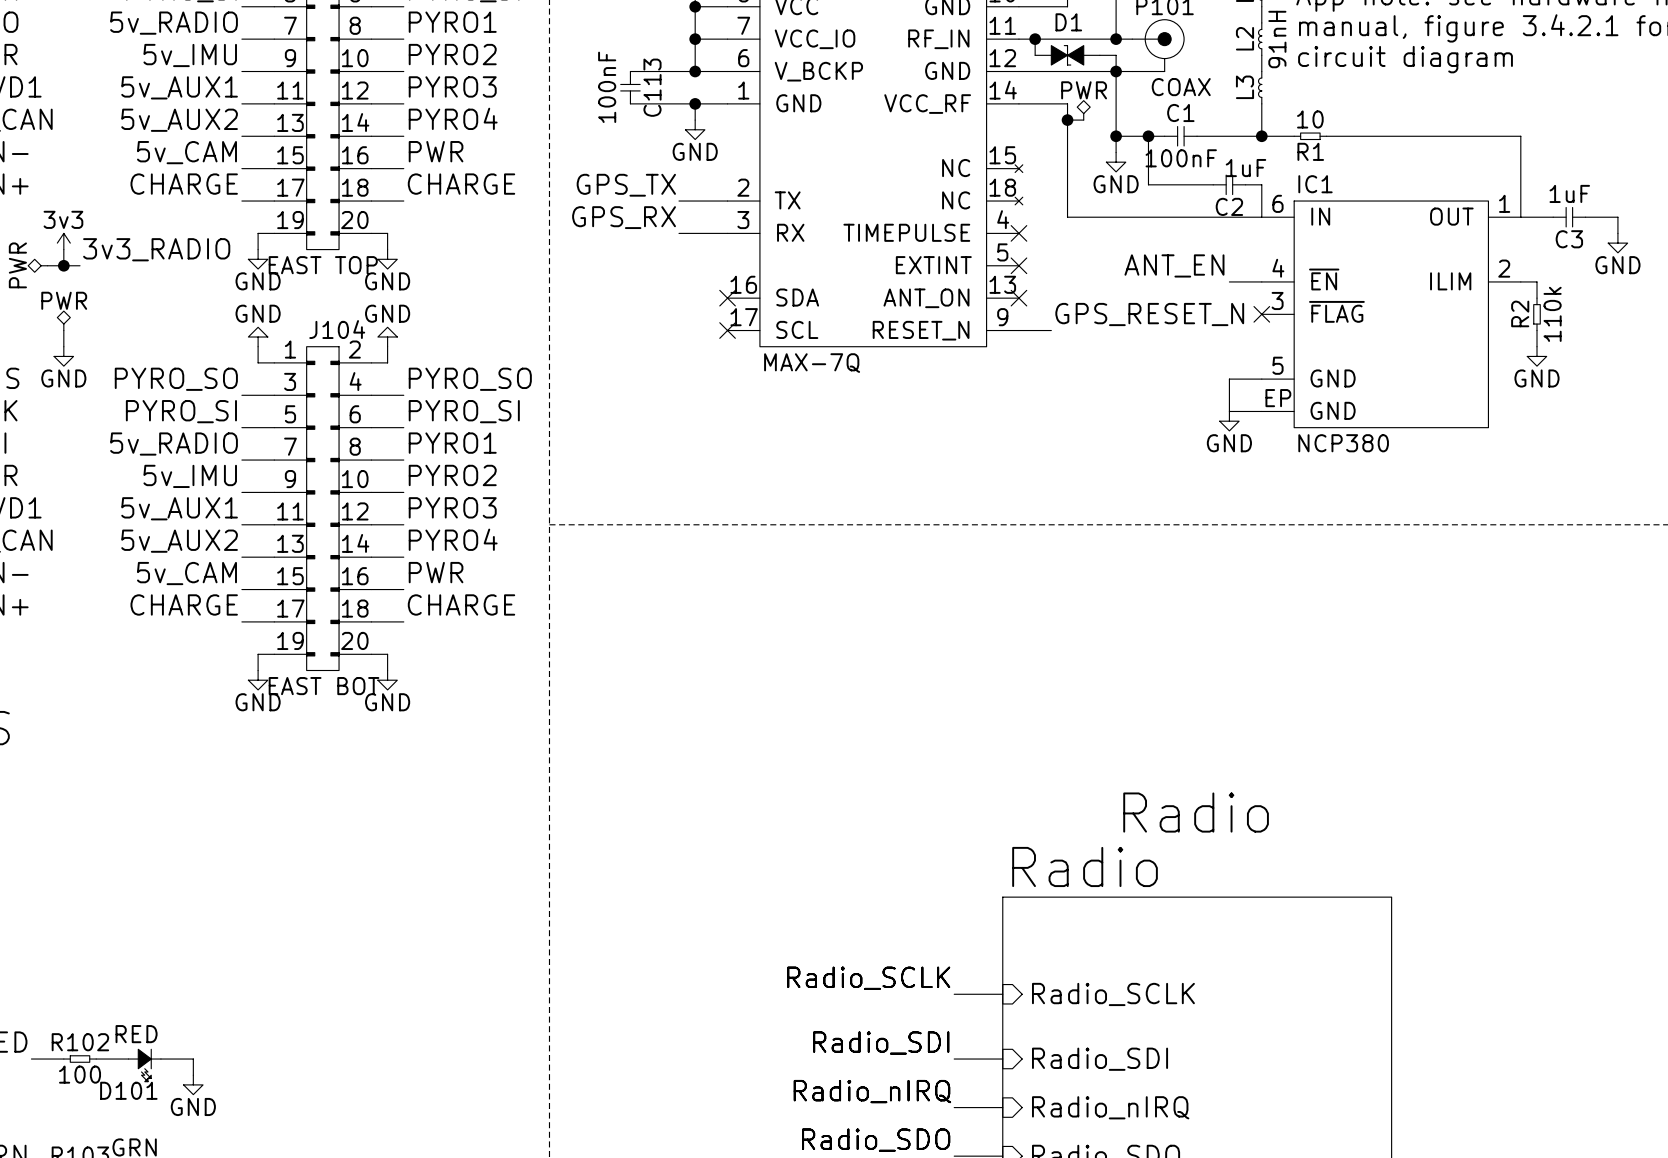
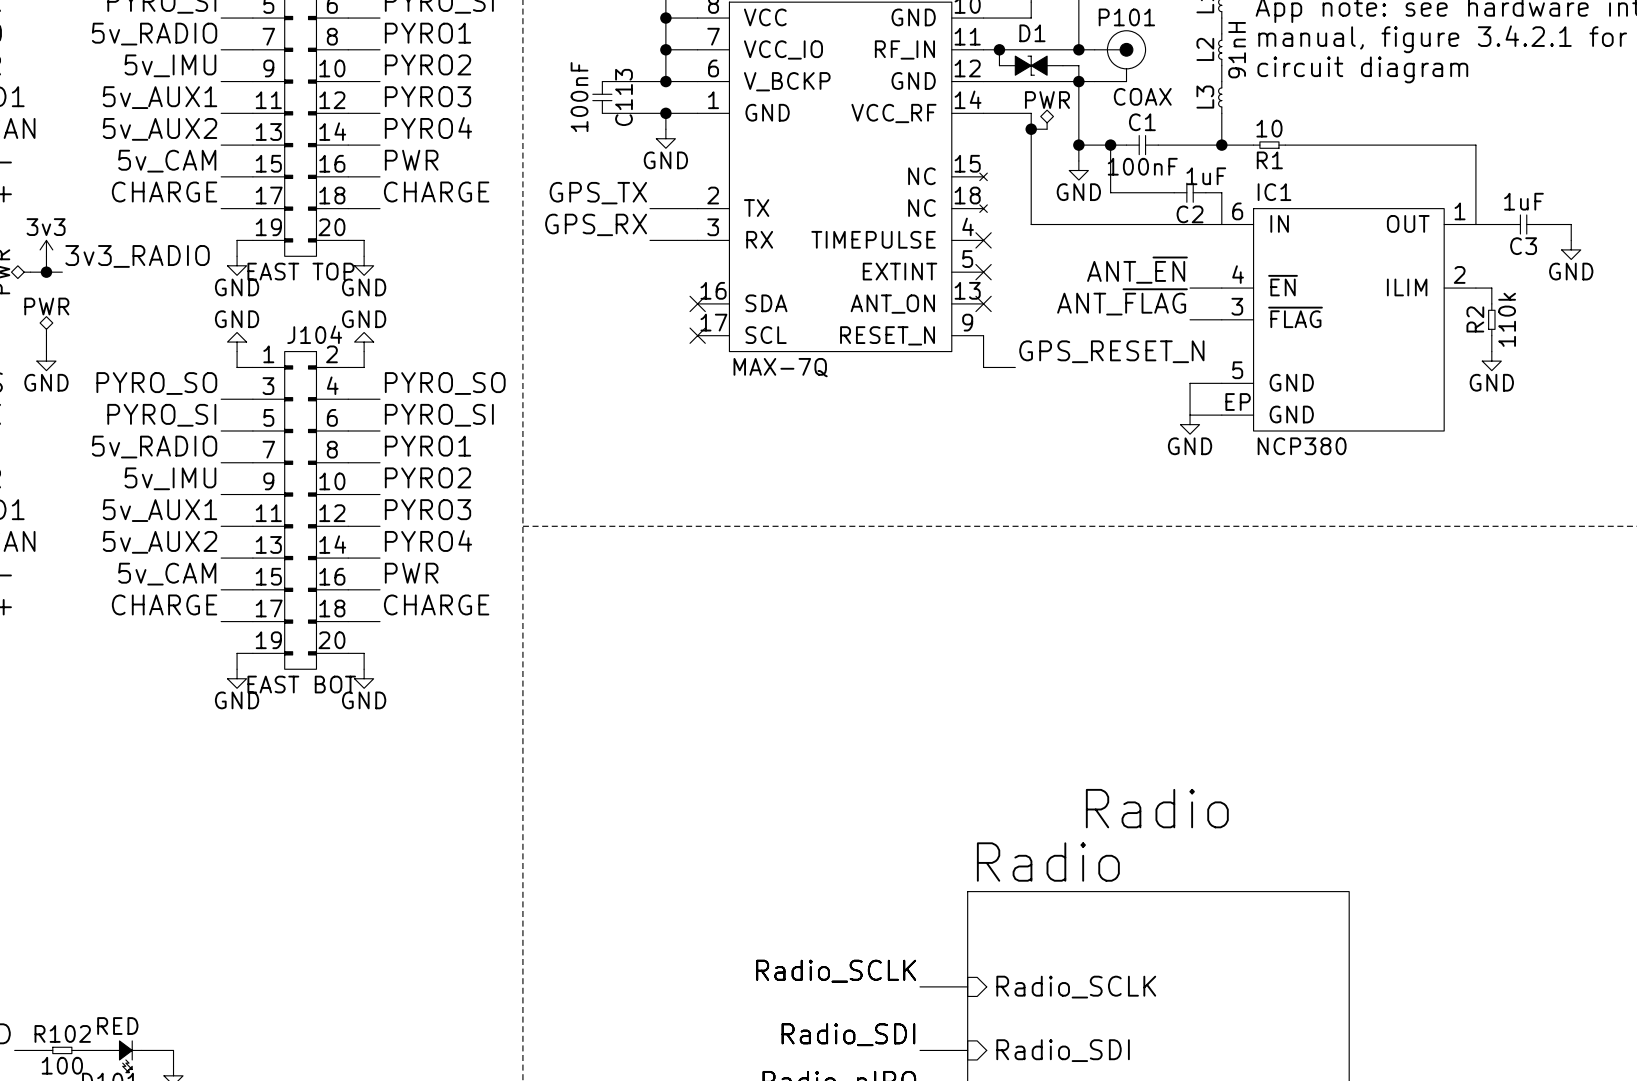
label: ANT_EN (1174, 265) -> ANT_~{EN} (1137, 270)
label: none -> ANT_~{FLAG} (1122, 301)
label position: GPS_RESET_N (1149, 314) -> GPS_RESET_N (1111, 351)
wire: none -> (1190, 319) (1221, 319)
no-connect mark: (1261, 314) -> none
wire: (1018, 330) (1051, 330) -> (983, 335) (983, 367) (1015, 367)

